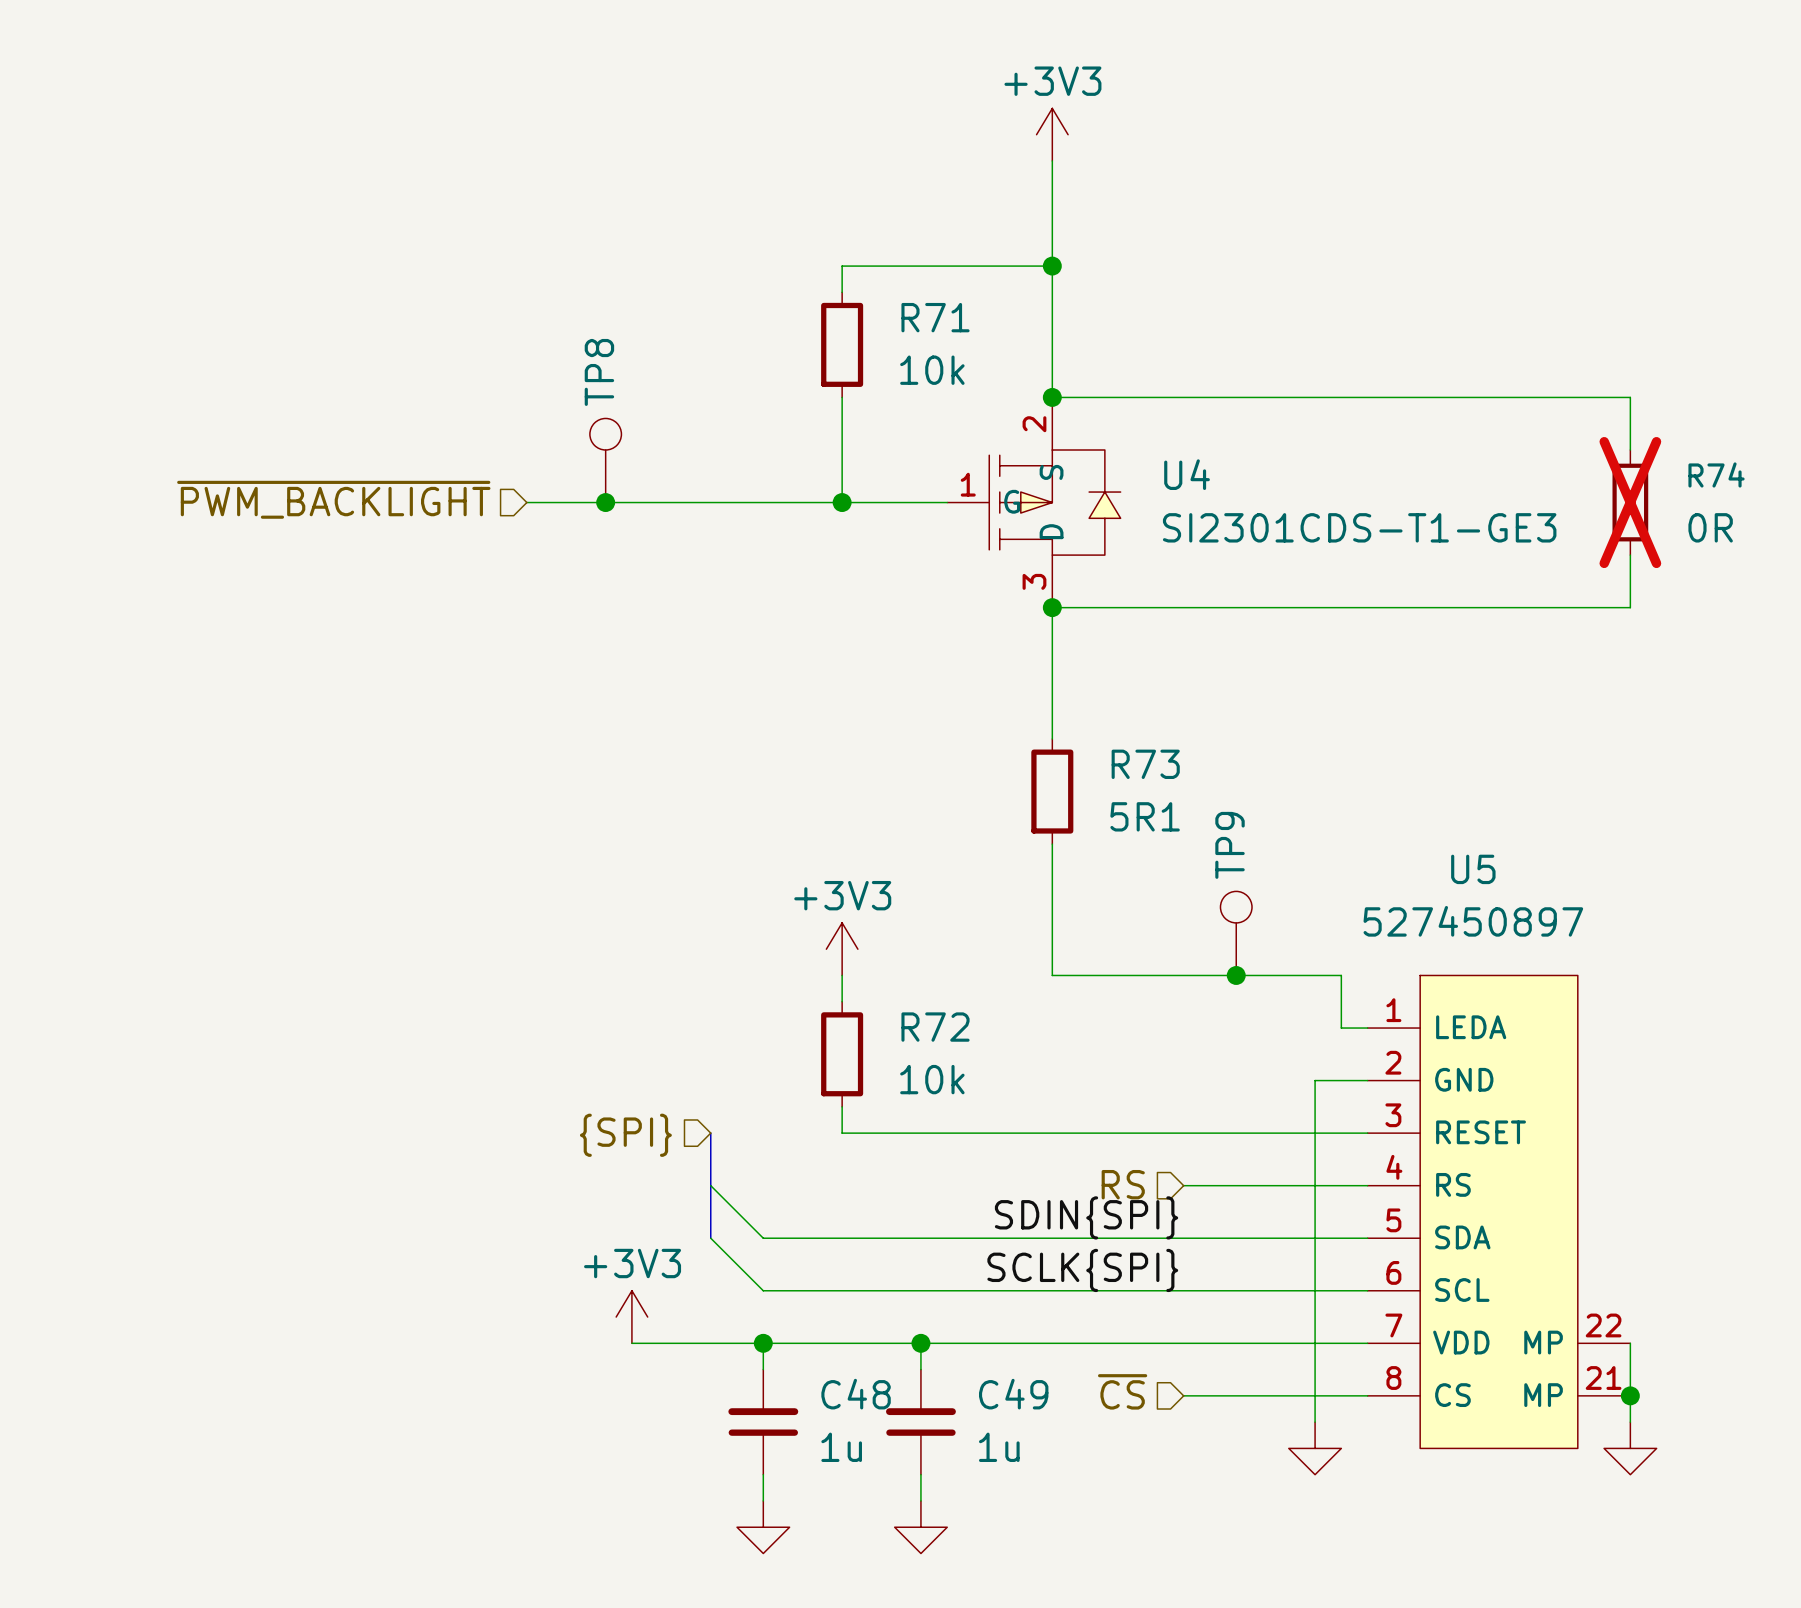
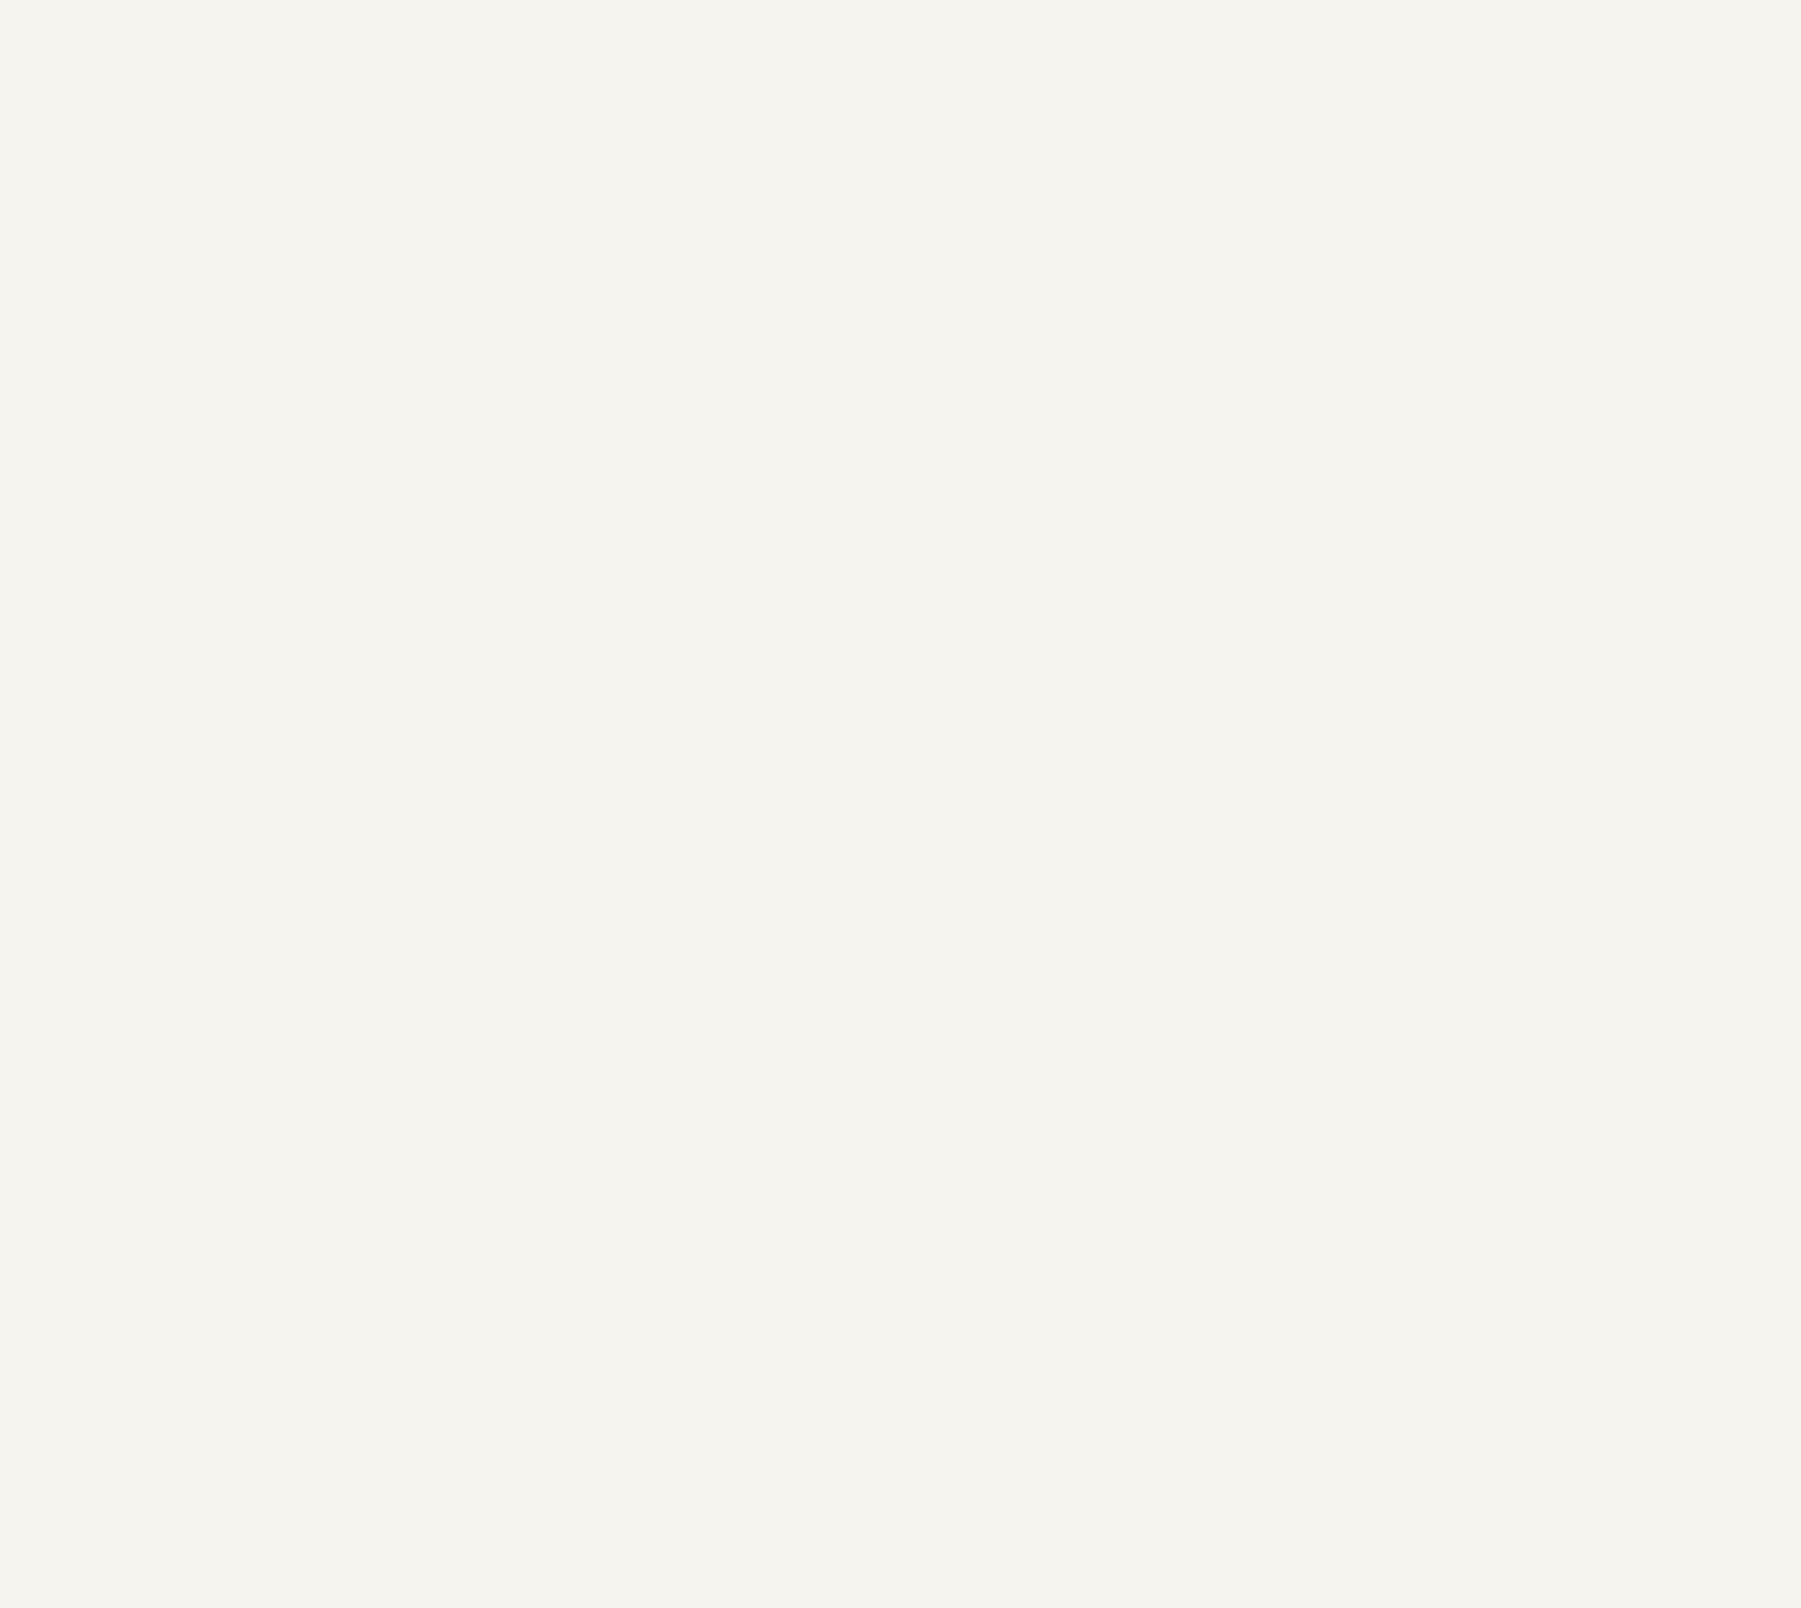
power symbol: +3V3 (1052, 134) -> none
wire: (1052, 160) (1052, 397) (1630, 397) (1630, 449) -> none
wire: (1052, 266) (842, 266) (842, 292) -> none
junction: (1052, 266) -> none
R71: (842, 344) -> none
wire: (842, 397) (842, 502) -> none
junction: (1052, 397) -> none
TP8: (605, 460) -> none
hierarchical label: ~{PWM_BACKLIGHT} (333, 499) -> none
wire: (526, 502) (947, 502) -> none
junction: (605, 502) -> none
junction: (842, 502) -> none
U4: SI2301CDS-T1-GE3 (1033, 502) -> none
R74: 0R (1630, 502) -> none
wire: (1630, 555) (1630, 607) (1052, 607) (1052, 739) -> none
junction: (1052, 607) -> none
R73: (1052, 791) -> none
wire: (1052, 844) (1052, 975) (1341, 975) (1341, 1028) (1367, 1028) -> none
TP9: (1236, 933) -> none
power symbol: +3V3 (842, 949) -> none
wire: (842, 975) (842, 1001) -> none
junction: (1236, 975) -> none
R72: (842, 1054) -> none
wire: (1367, 1080) (1315, 1080) (1315, 1422) -> none
wire: (842, 1106) (842, 1133) (1367, 1133) -> none
bus: (710, 1133) (710, 1238) -> none
hierarchical label: {SPI} (625, 1135) -> none
hierarchical label: RS (1123, 1184) -> none
wire: (710, 1185) (763, 1238) (1367, 1238) -> none
wire: (1183, 1185) (1367, 1185) -> none
U5: 527450897 (1498, 1211) -> none
label: SDIN{SPI} (1086, 1217) -> none
wire: (710, 1238) (763, 1290) (1367, 1290) -> none
label: SCLK{SPI} (1082, 1270) -> none
power symbol: +3V3 (631, 1317) -> none
wire: (631, 1343) (1367, 1343) -> none
wire: (763, 1343) (763, 1369) -> none
junction: (763, 1343) -> none
wire: (920, 1343) (920, 1369) -> none
junction: (920, 1343) -> none
wire: (1630, 1343) (1630, 1422) -> none
hierarchical label: ~{CS} (1122, 1391) -> none
wire: (1183, 1395) (1367, 1395) -> none
junction: (1630, 1395) -> none
C48: (763, 1422) -> none
C49: (920, 1422) -> none
power symbol: (1315, 1448) -> none
power symbol: (1630, 1448) -> none
wire: (763, 1474) (763, 1500) -> none
wire: (920, 1474) (920, 1500) -> none
power symbol: (763, 1527) -> none
power symbol: (920, 1527) -> none

